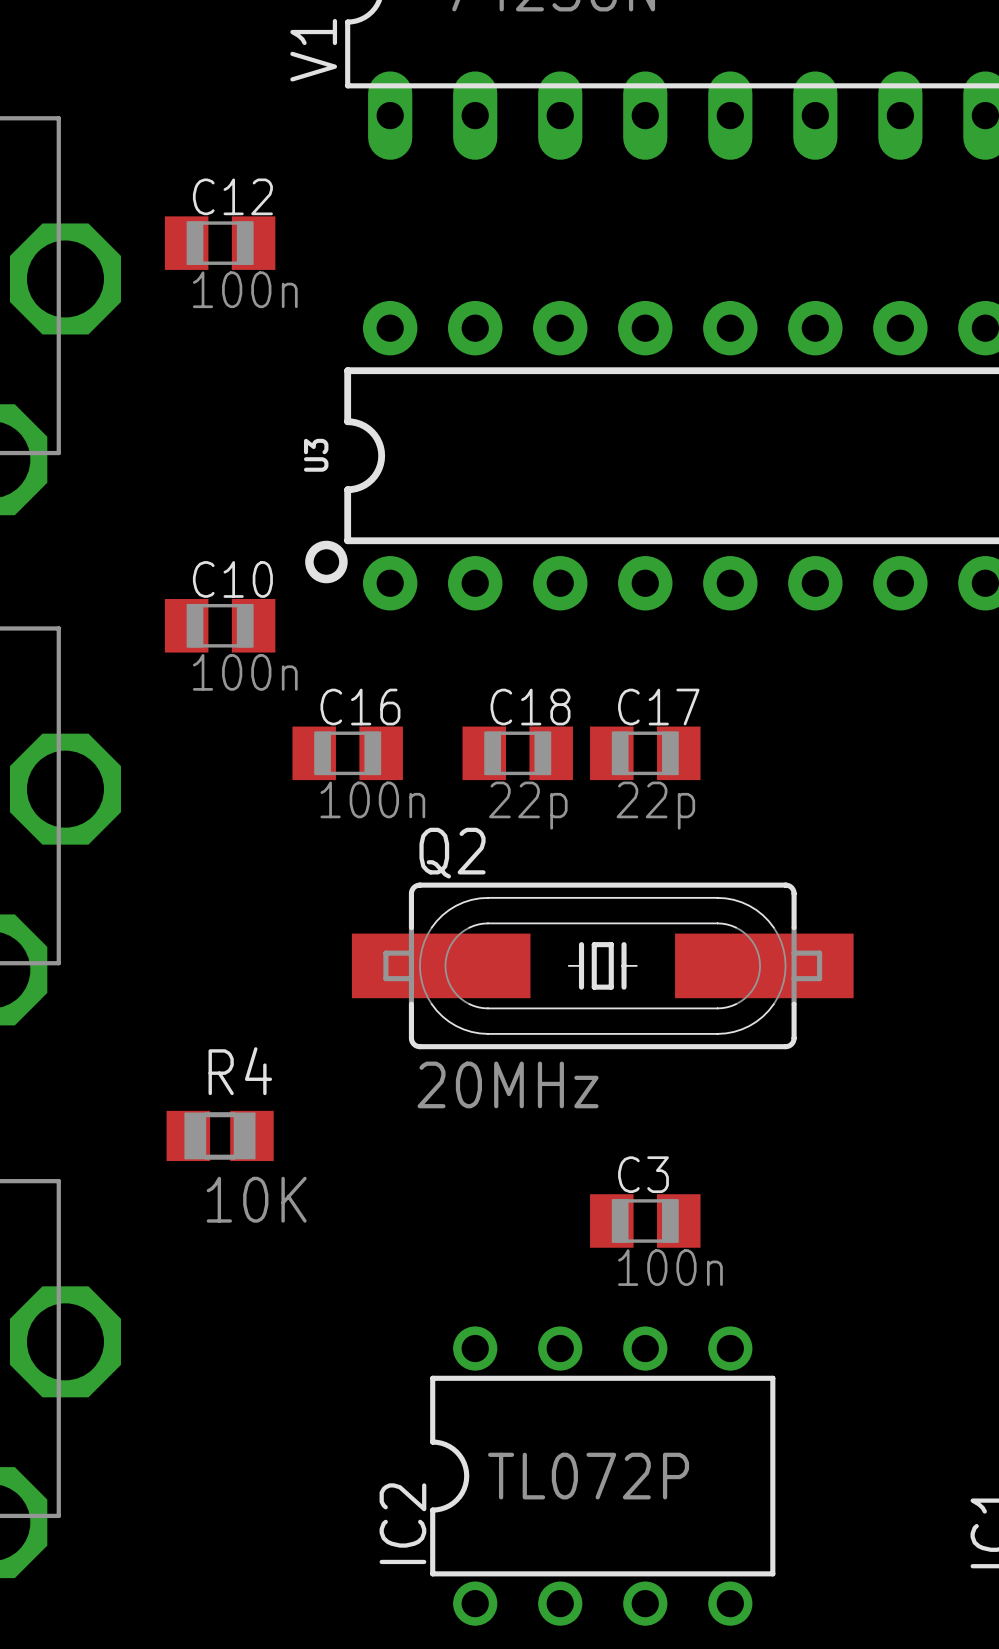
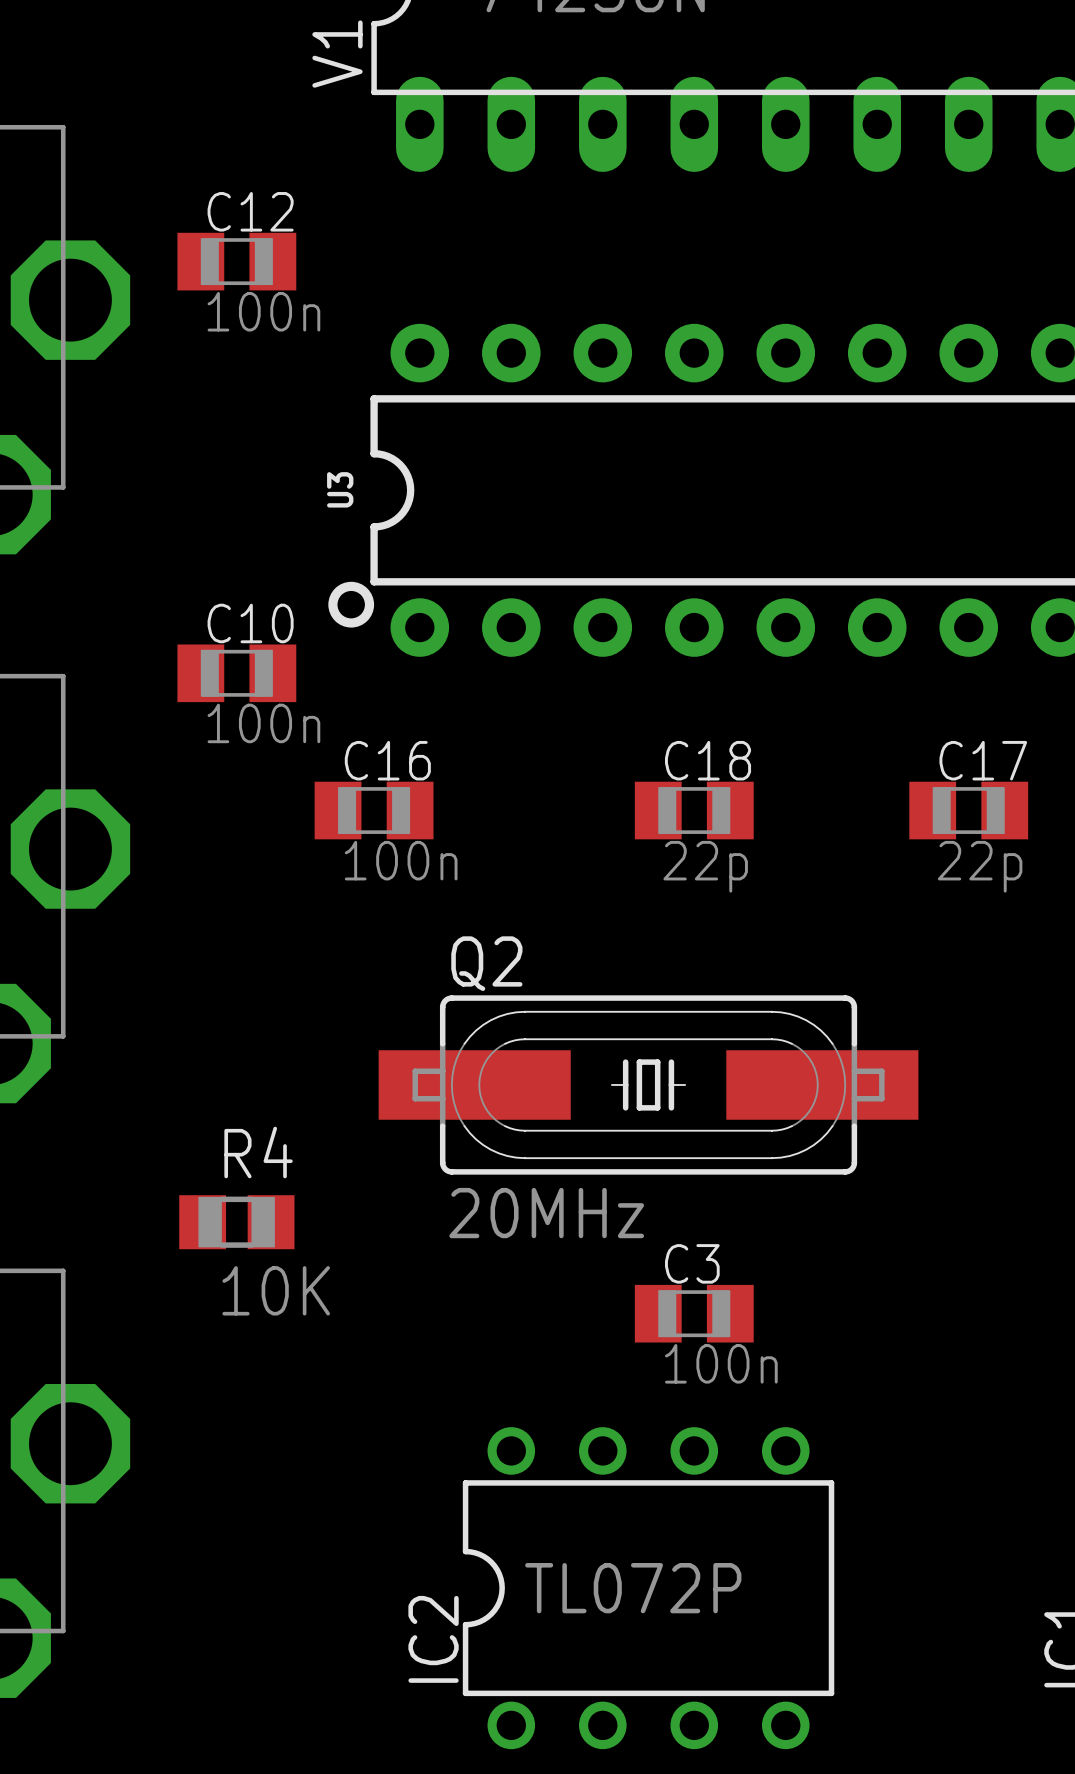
C17 name: C17 (658, 707) -> C18 (708, 760)
C18: 22p (517, 753) -> none
C17: none -> 22p (968, 810)
Q2 position: (602, 965) -> (648, 1084)

